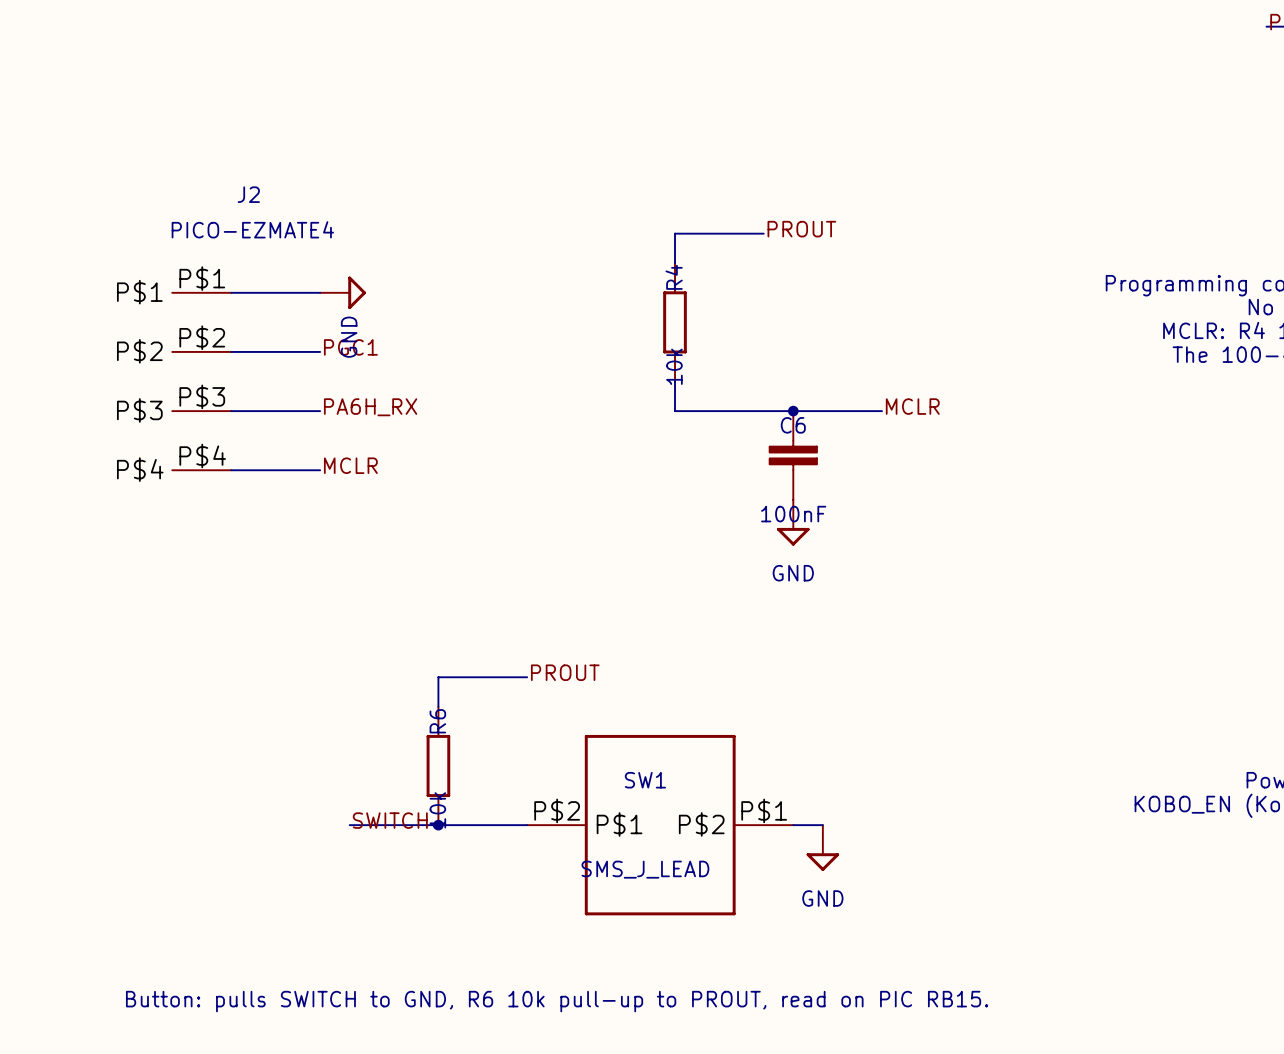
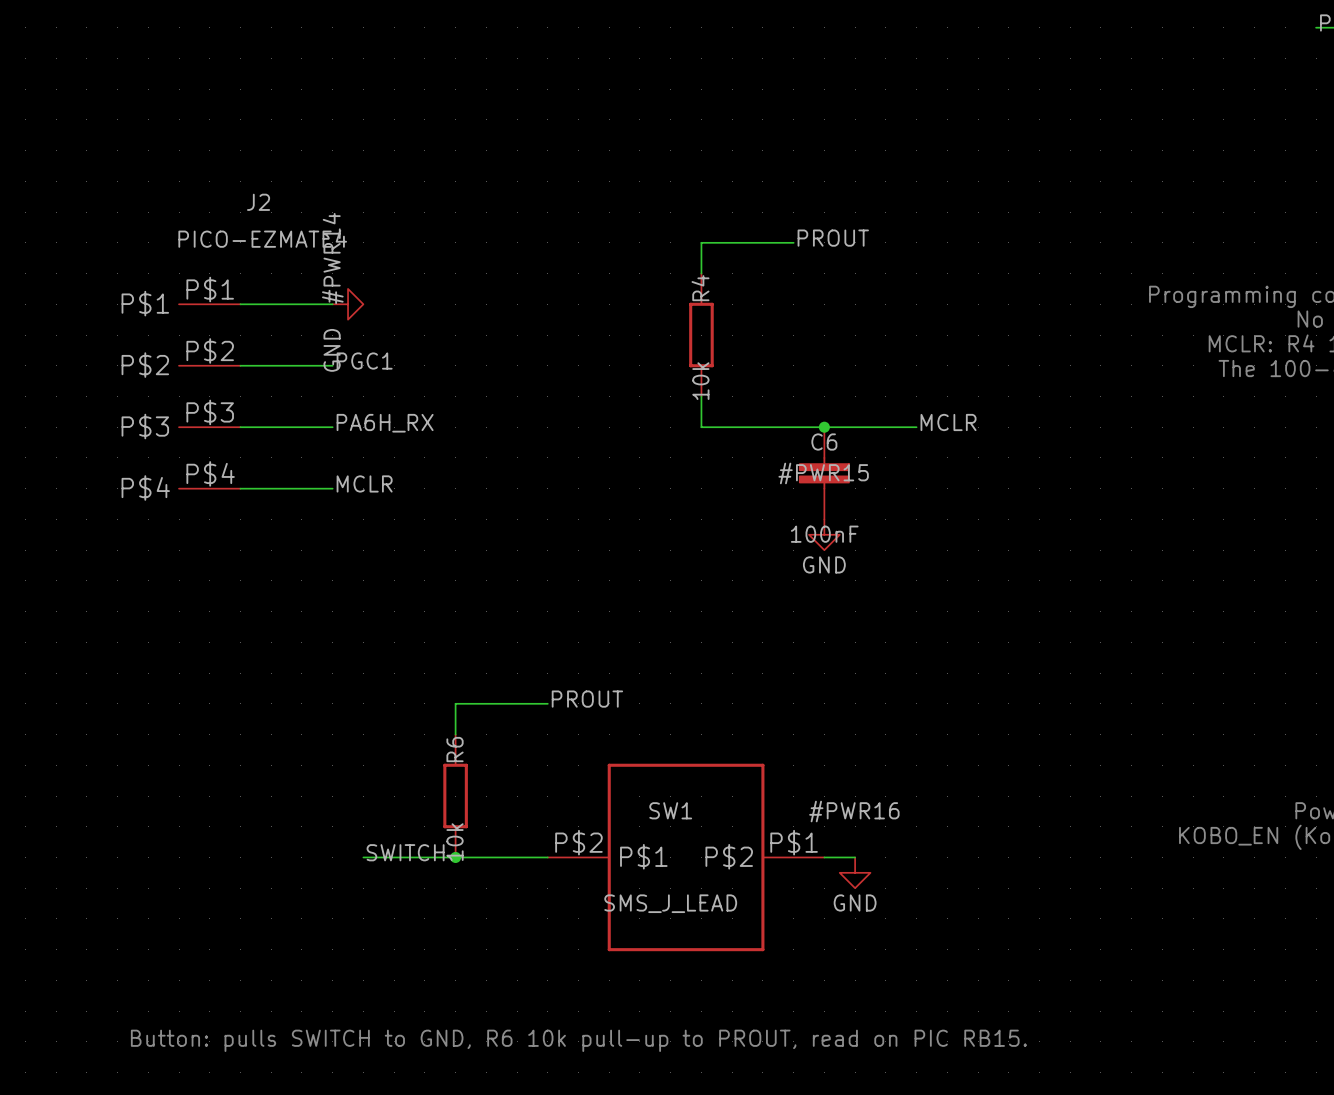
#PWR14 name: none -> #PWR14 (332, 258)
#PWR14 shape: [320, 276, 366, 310] -> [332, 288, 364, 320]
#PWR15 name: none -> #PWR15 (823, 473)
#PWR15 shape: [777, 499, 810, 546] -> [809, 519, 840, 551]
#PWR16 name: none -> #PWR16 (854, 811)
#PWR16 shape: [806, 825, 840, 871] -> [839, 857, 871, 889]

